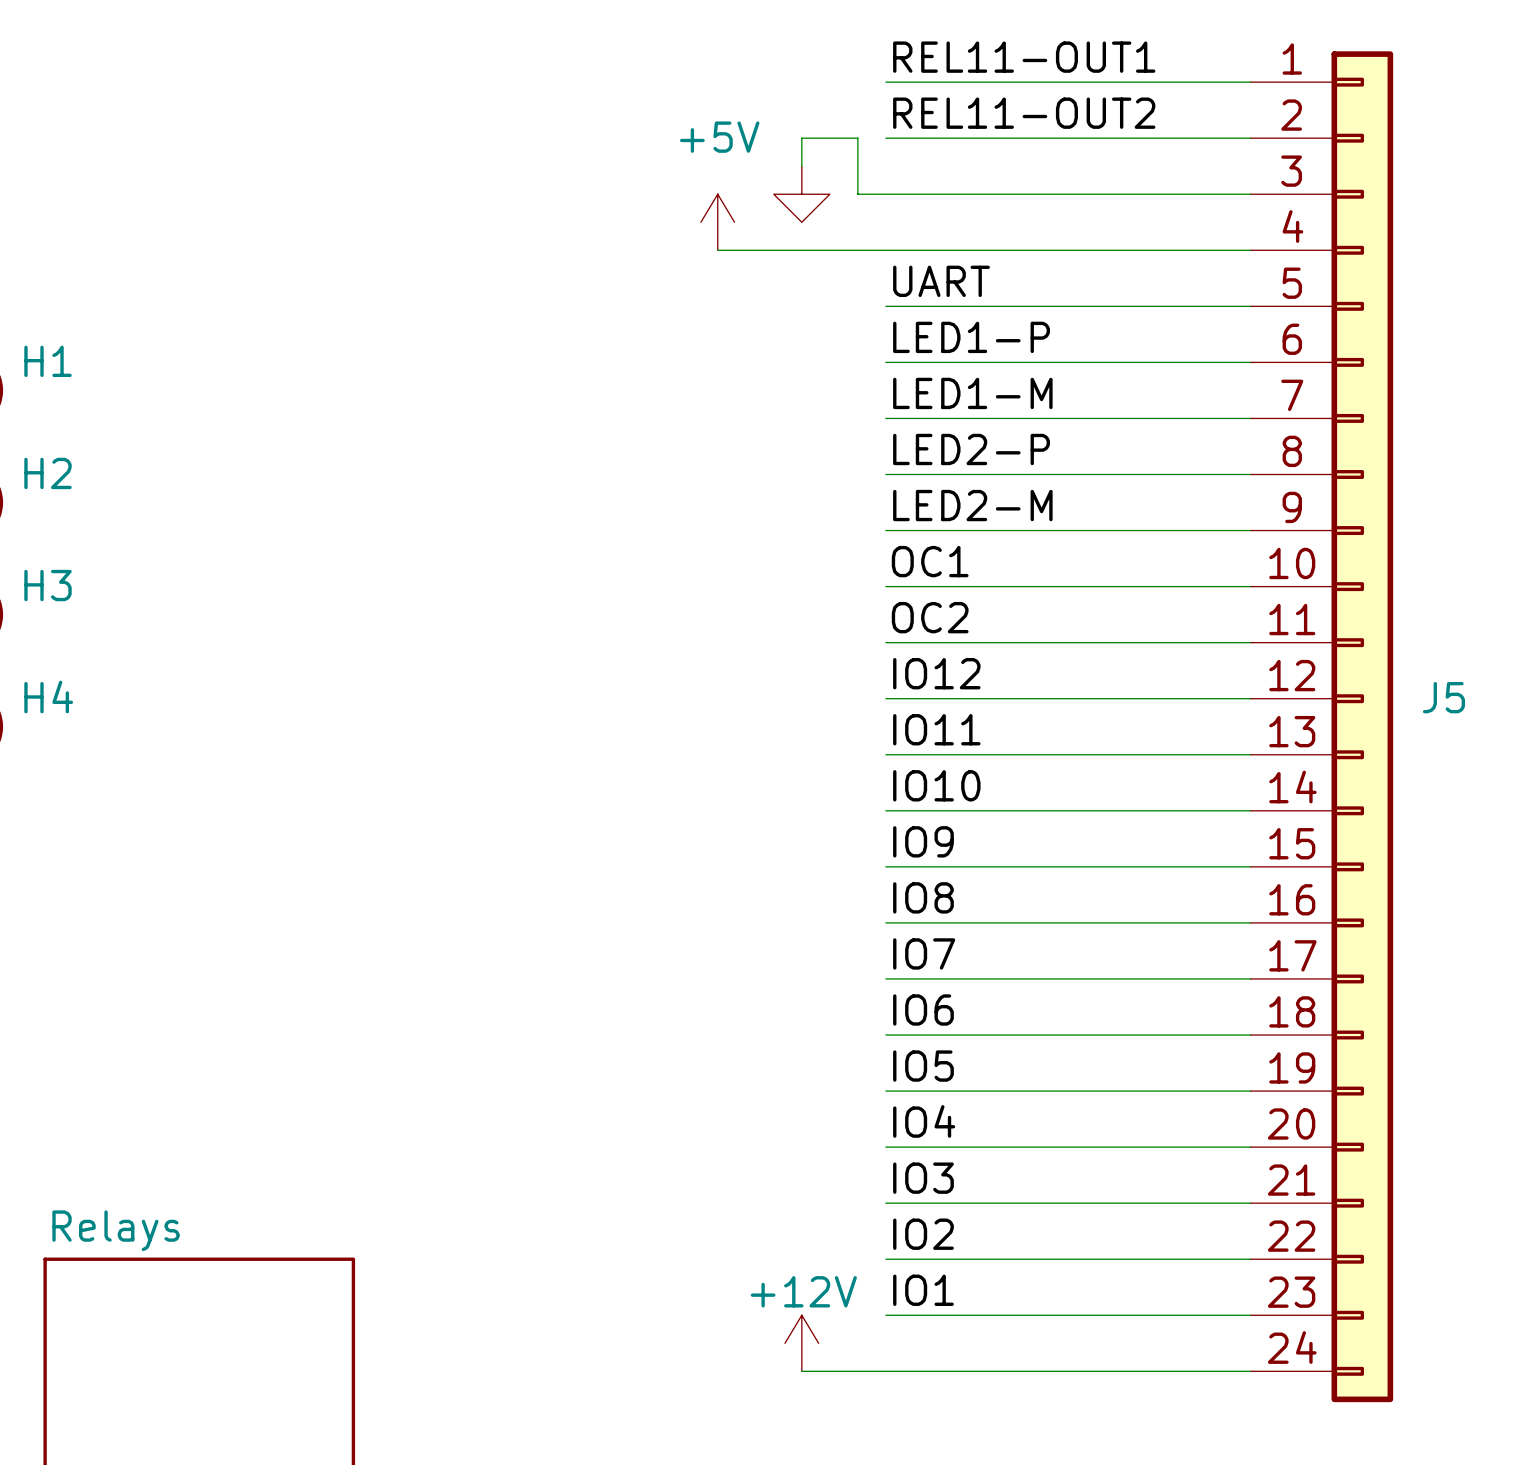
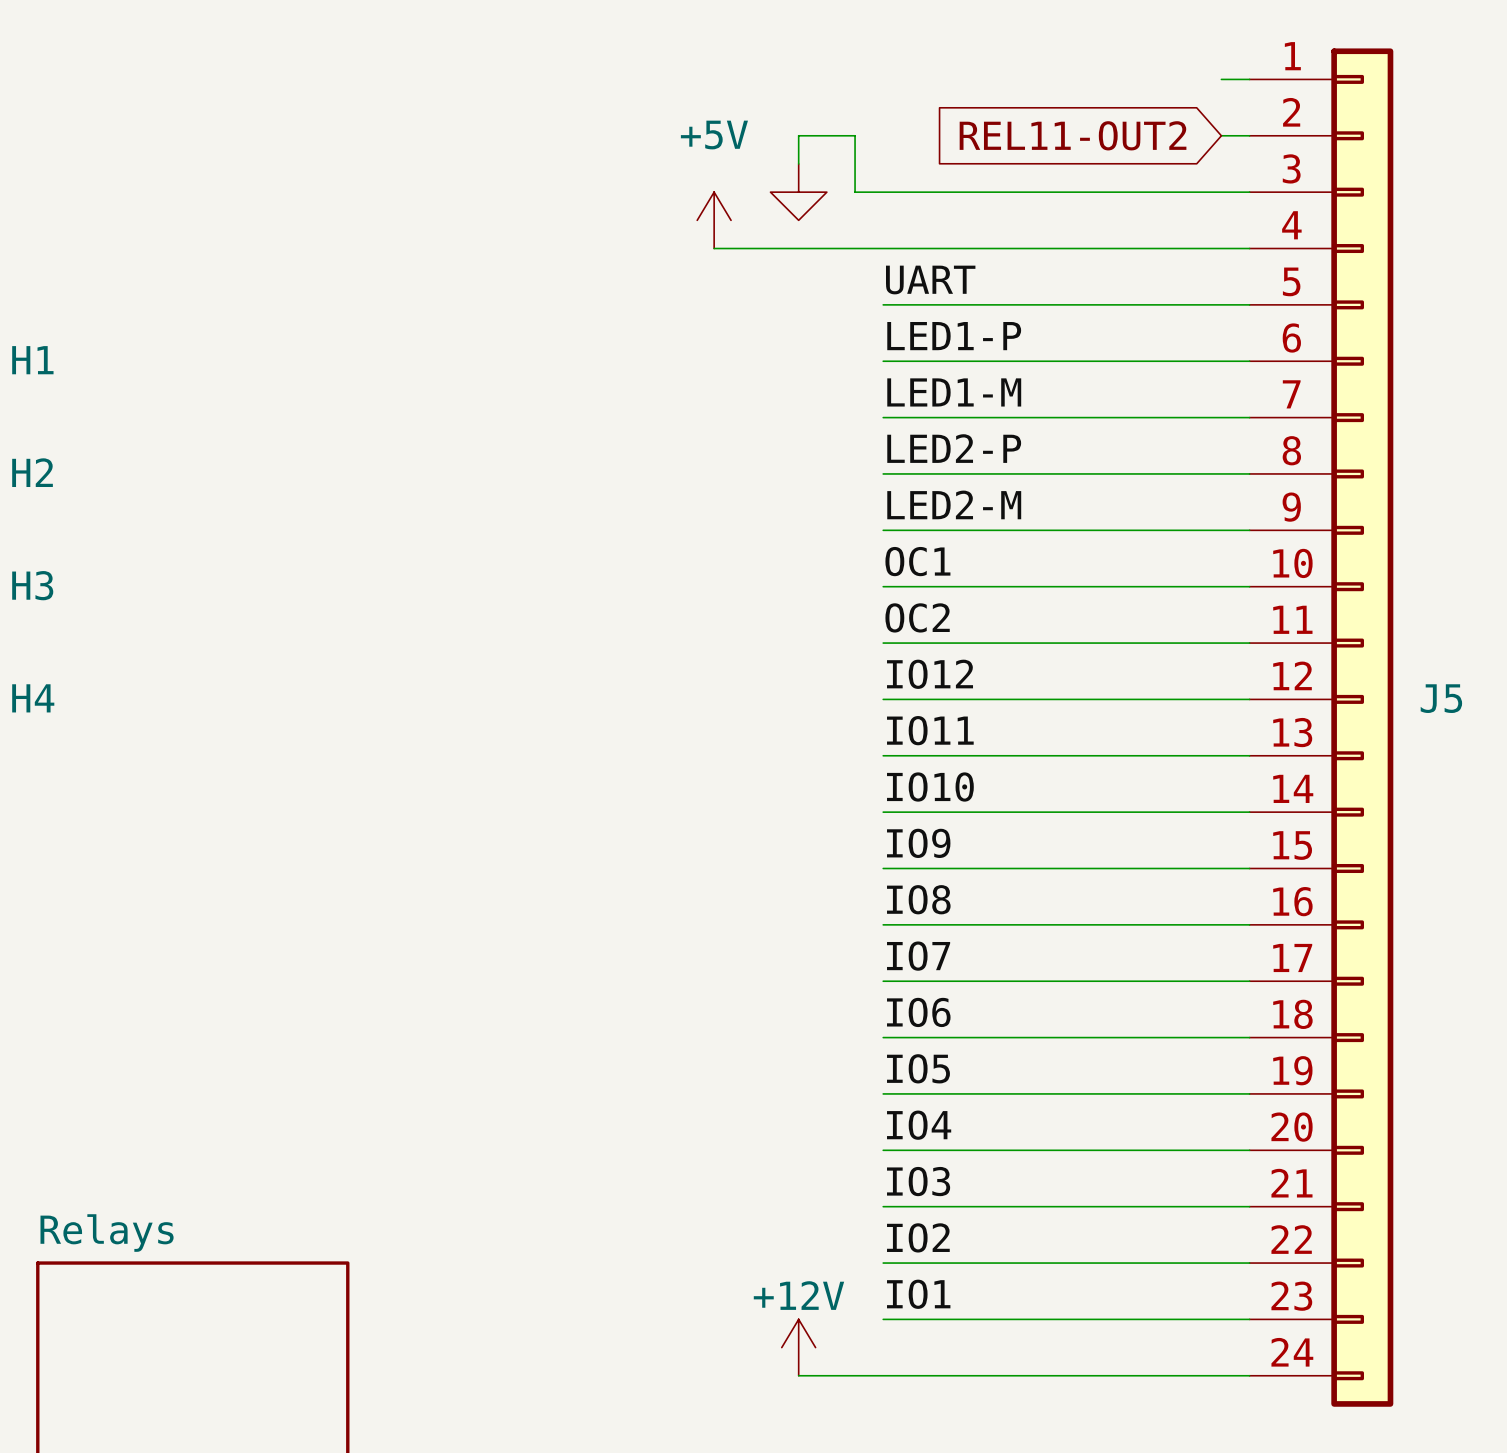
label: REL11-OUT1 (1024, 57) -> none
wire: (885, 82) (1222, 82) -> none
label: REL11-OUT2 (1024, 113) -> none
wire: (885, 138) (1222, 138) -> none
global label: none -> REL11-OUT2 (1073, 135)

